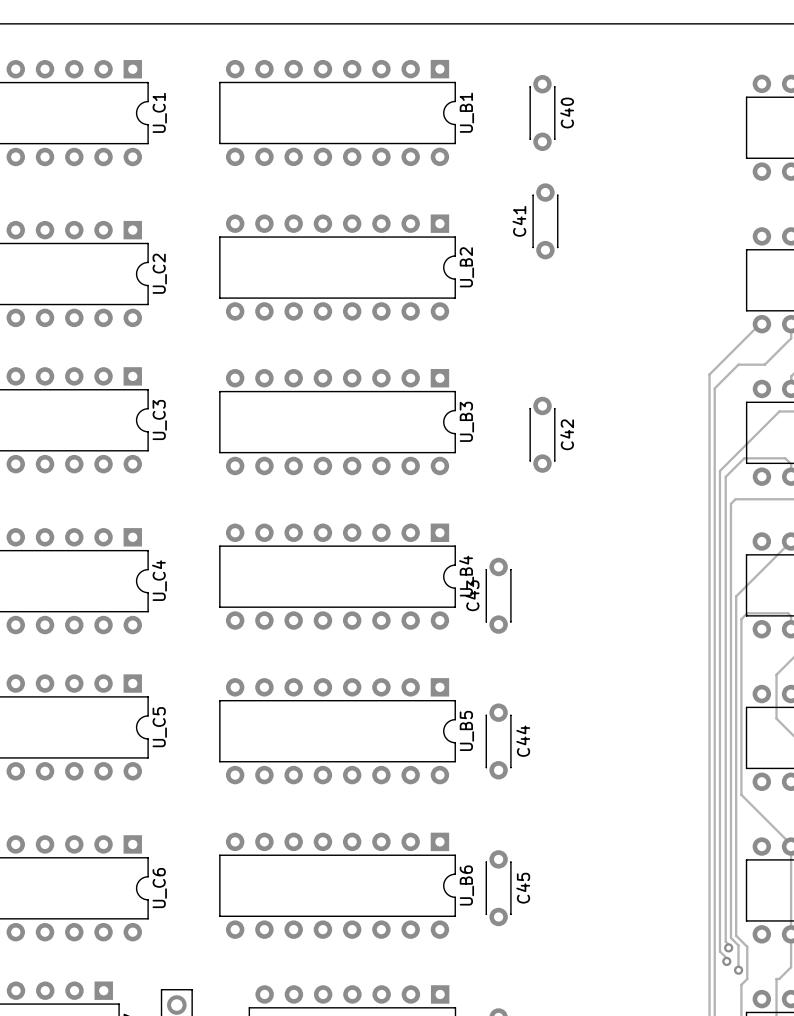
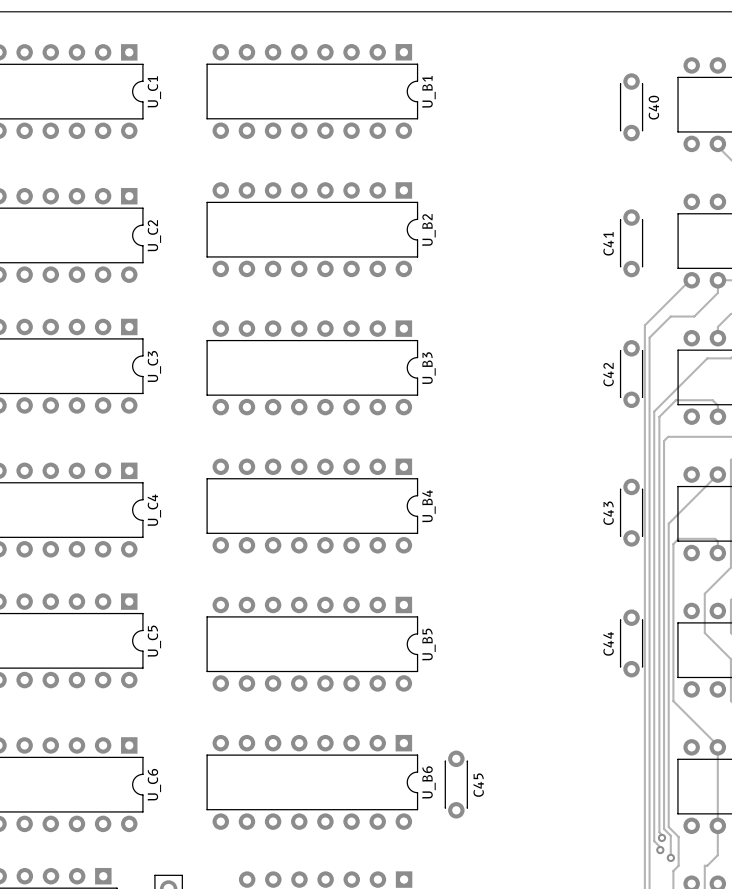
C40 position: (542, 113) -> (631, 107)
C41 position: (545, 221) -> (631, 243)
C42 position: (542, 434) -> (631, 374)
C42 name position: C42 (567, 434) -> C42 (608, 374)
C43 position: (498, 595) -> (631, 512)
C44 position: (498, 741) -> (631, 643)
C44 name position: C44 (523, 741) -> C44 (608, 643)

